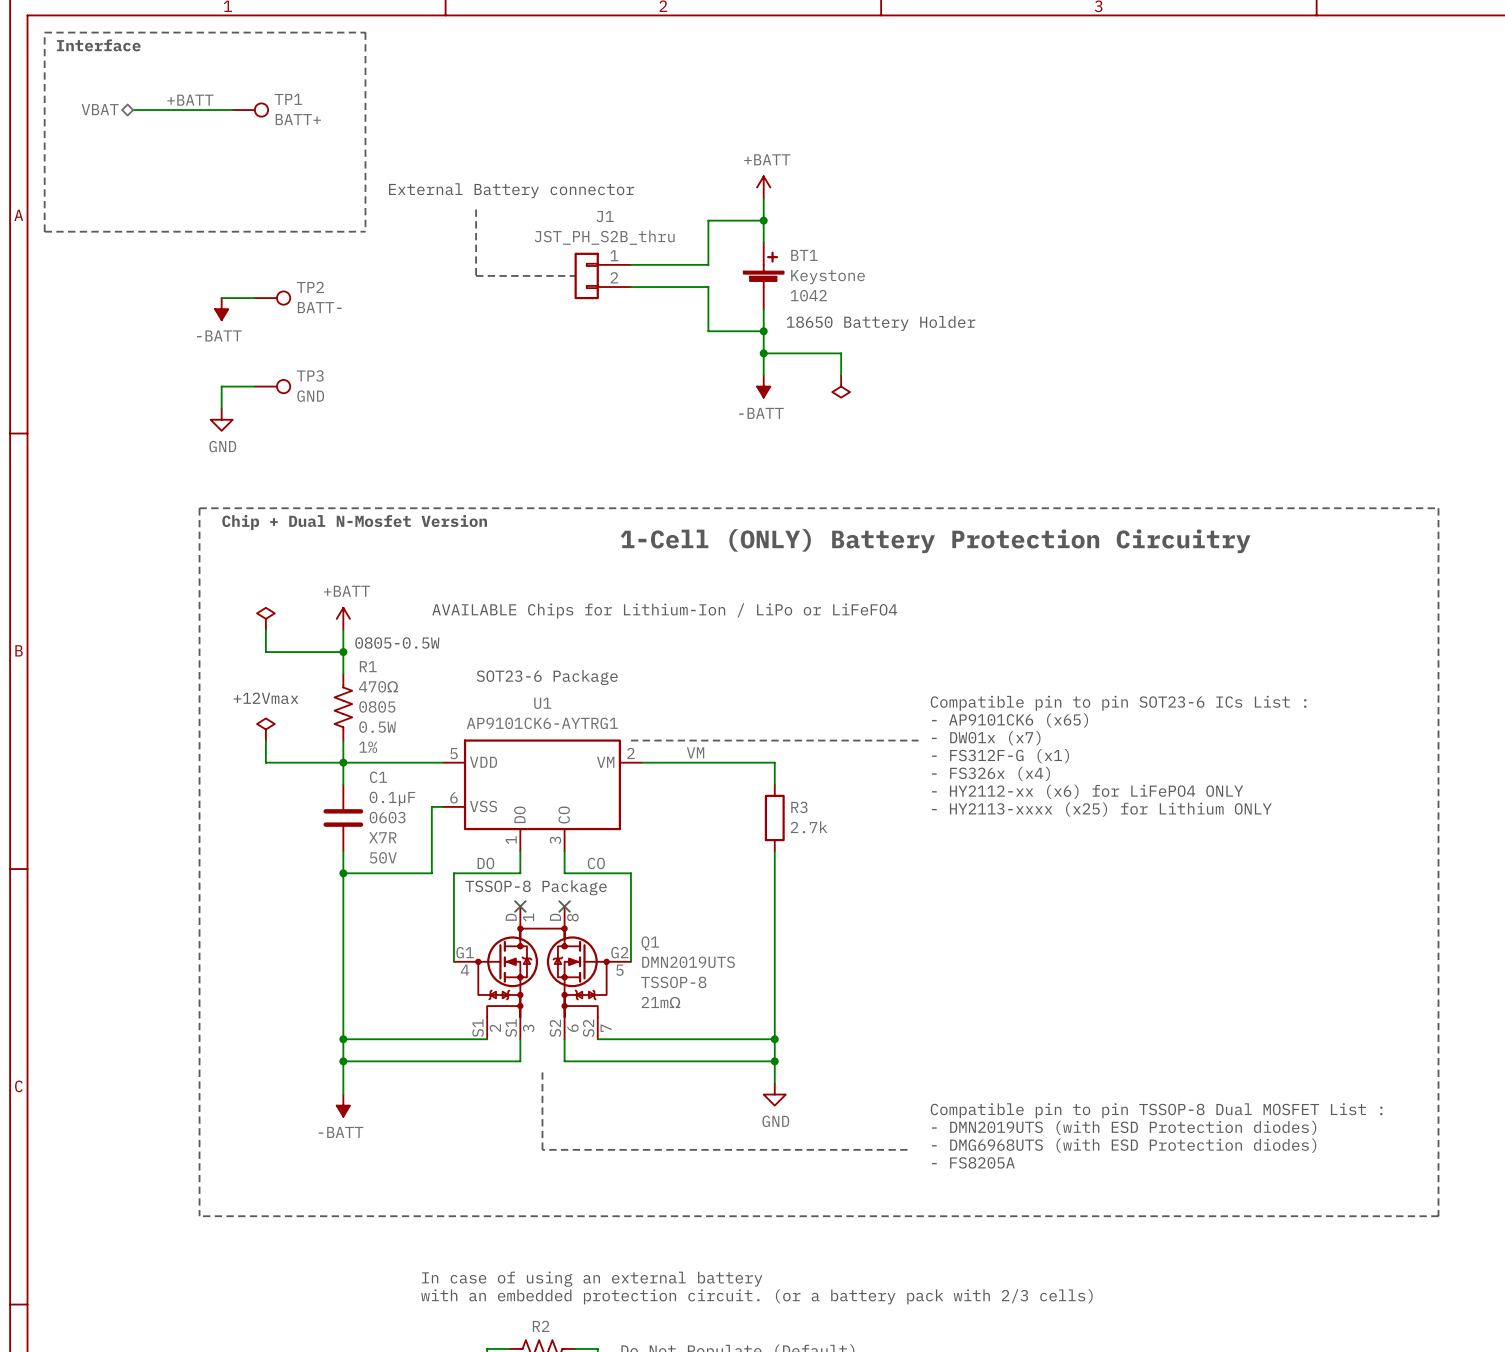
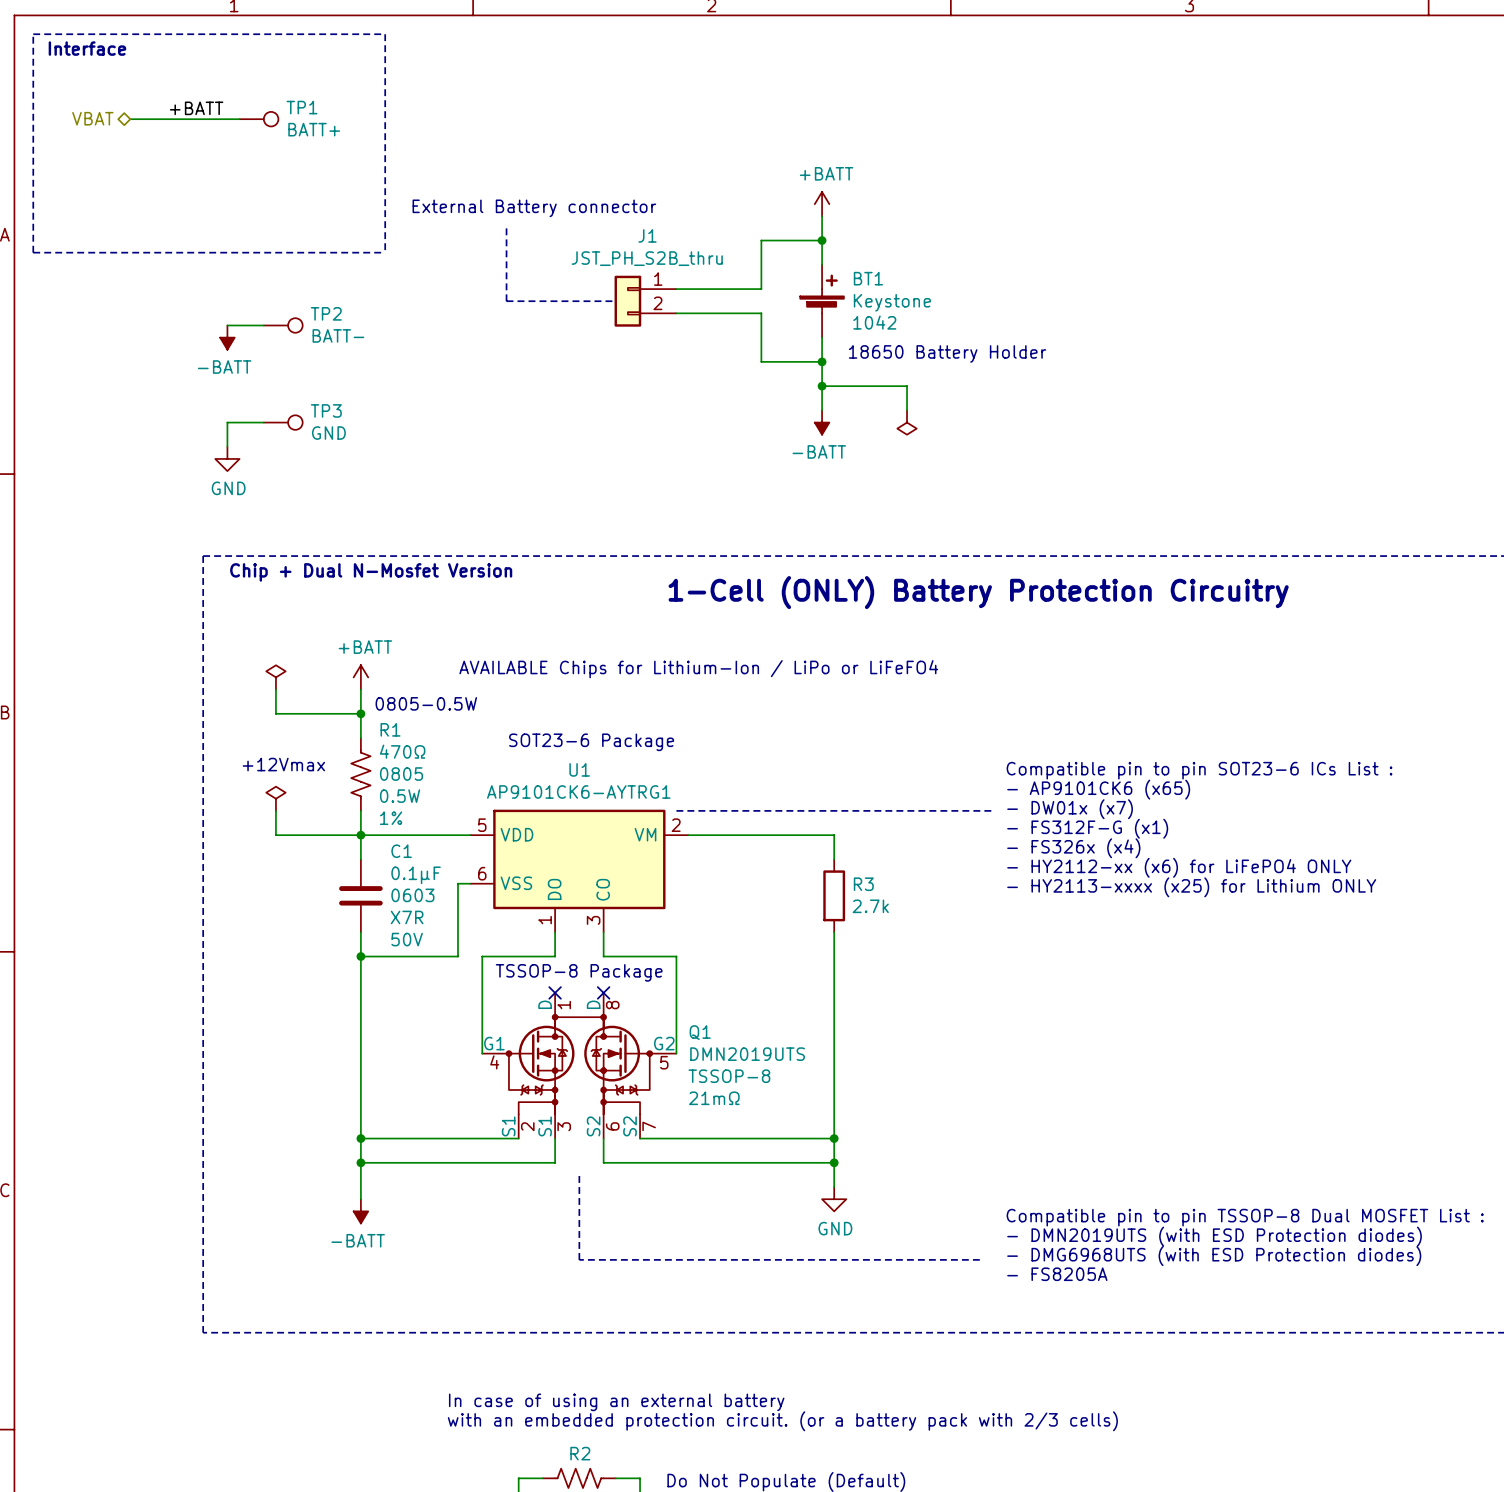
label: VM (695, 752) -> none
label: DO (485, 863) -> none
label: CO (596, 863) -> none

